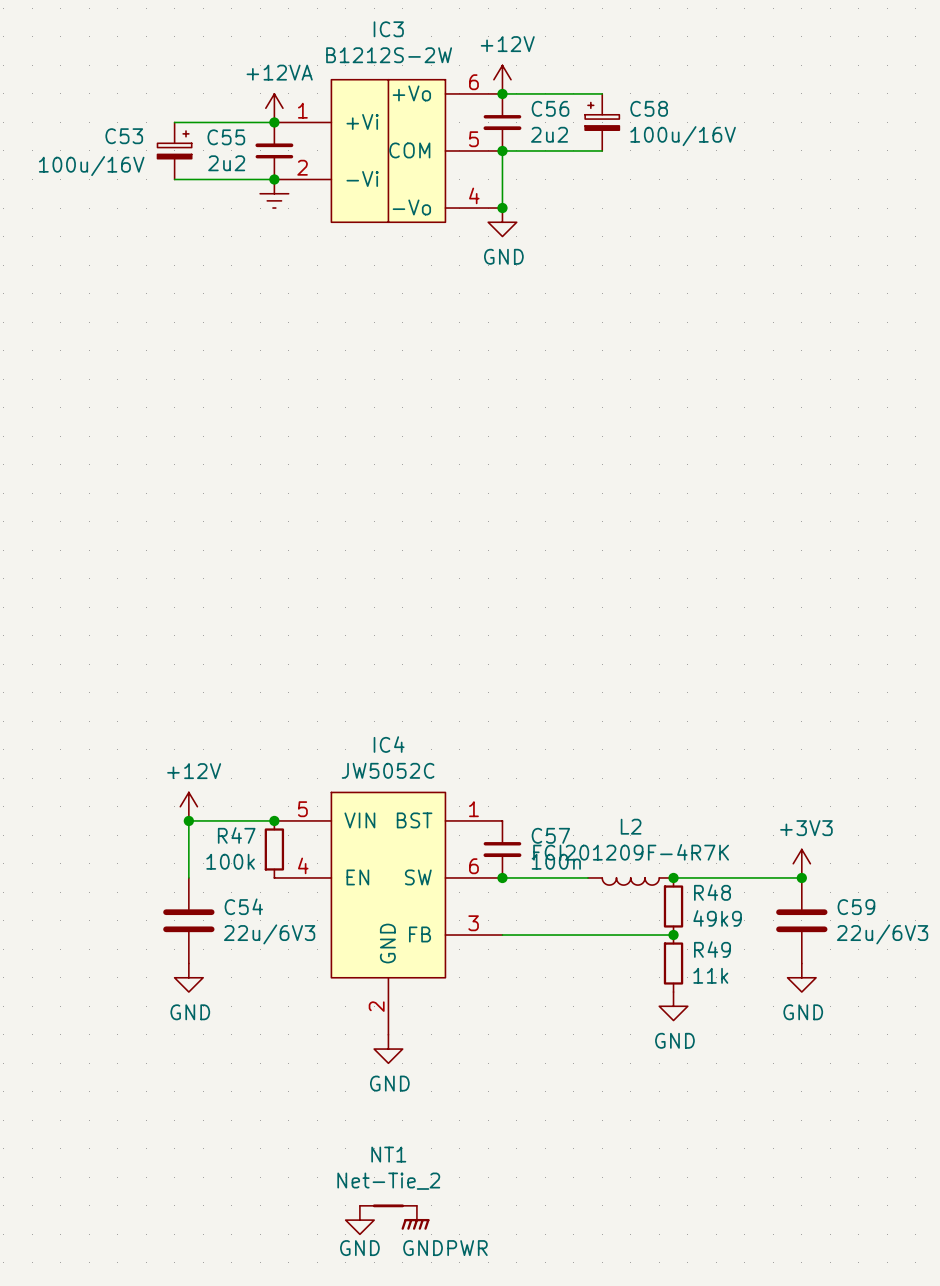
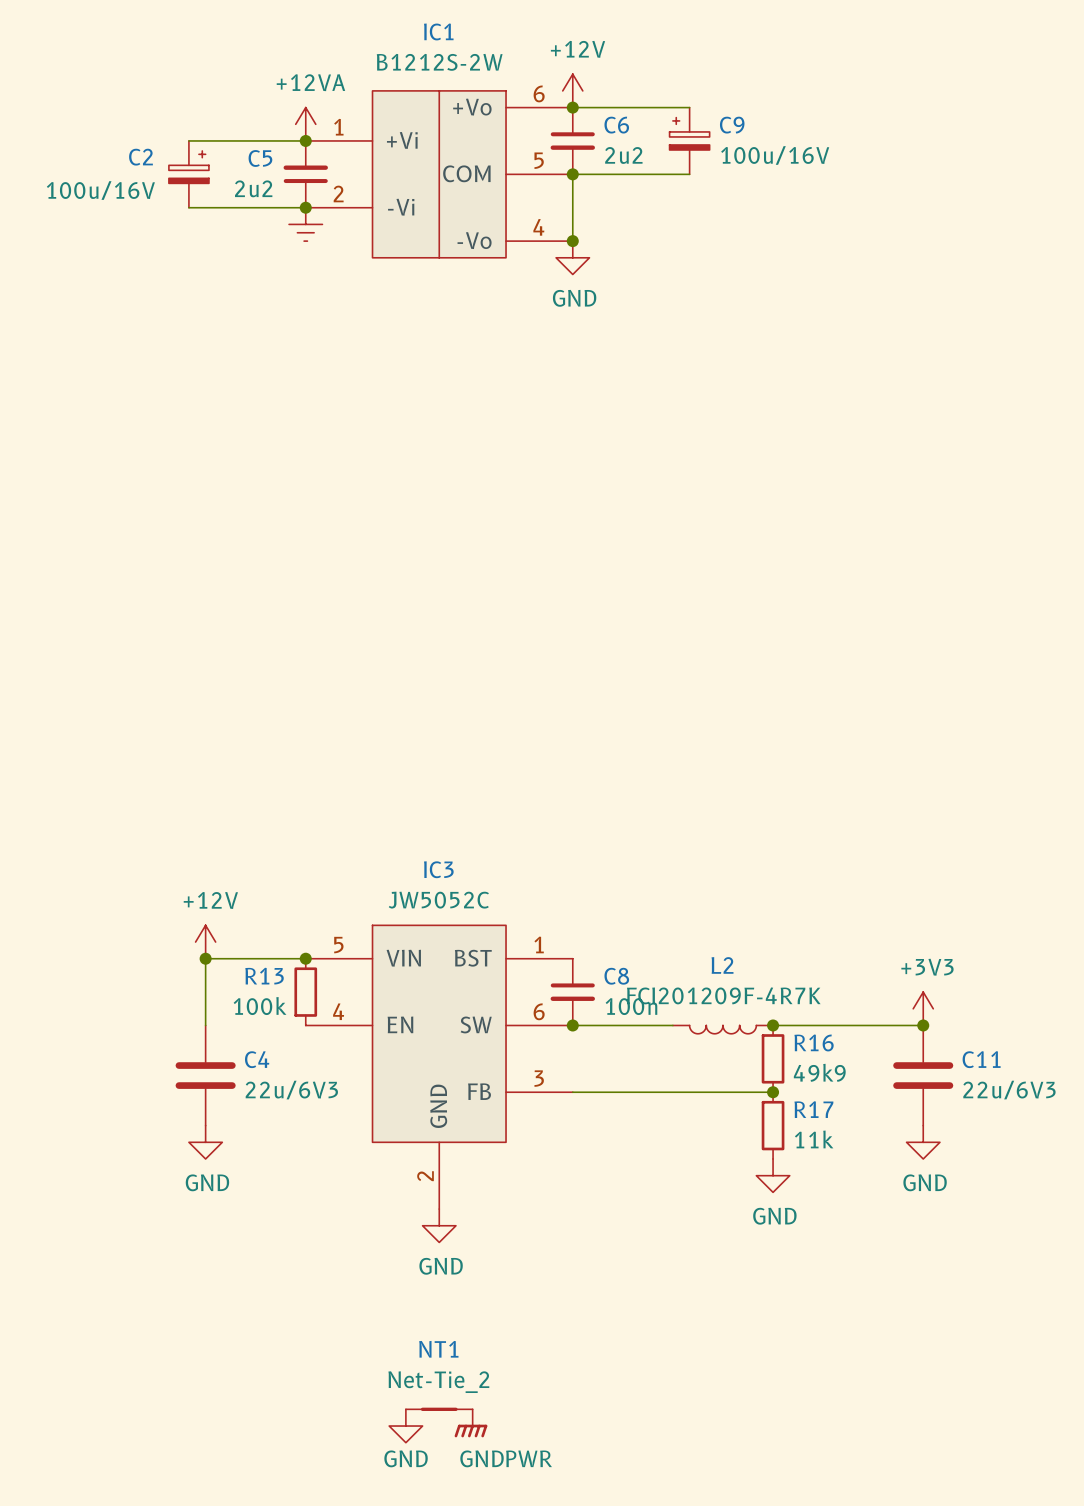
IC3 name: IC3 (388, 29) -> IC1 (438, 31)
C56 name: C56 (550, 108) -> C6 (616, 125)
C58 name: C58 (649, 108) -> C9 (732, 125)
C53 name: C53 (124, 136) -> C2 (140, 157)
C55 name: C55 (226, 137) -> C5 (260, 158)
IC4 name: IC4 (389, 744) -> IC3 (438, 869)
R47 name: R47 (236, 835) -> R13 (264, 976)
C57 name: C57 (550, 835) -> C8 (616, 976)
R48 name: R48 (712, 892) -> R16 (814, 1042)
C54 name: C54 (243, 906) -> C4 (257, 1059)
C59 name: C59 (856, 907) -> C11 (981, 1059)
R49 name: R49 (712, 949) -> R17 (813, 1109)

